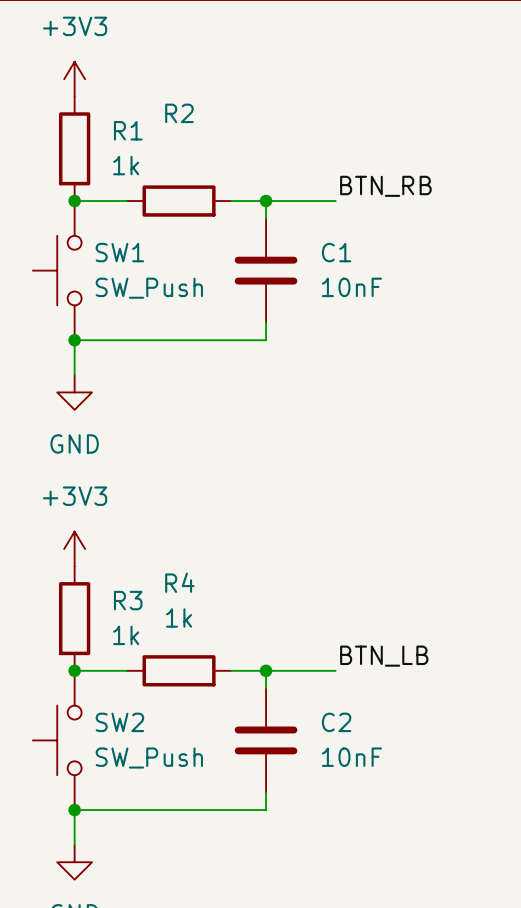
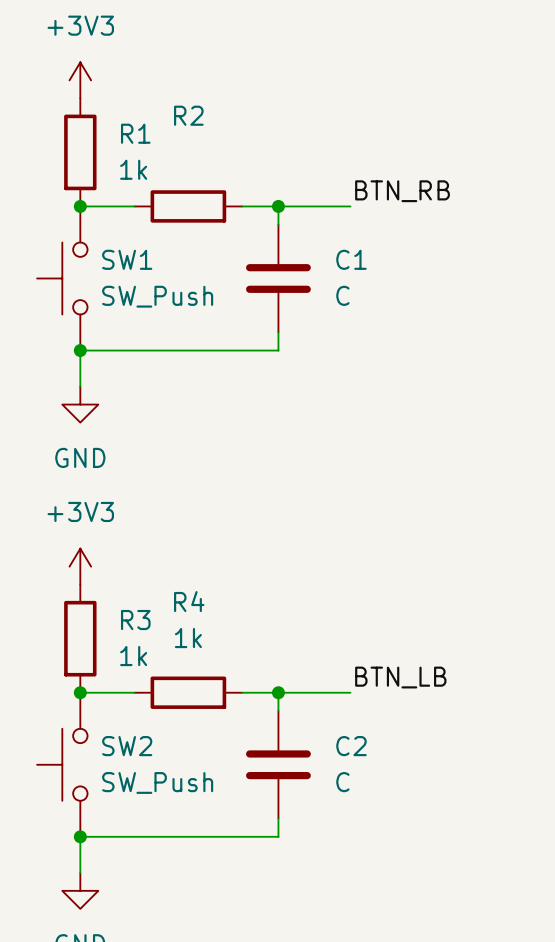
C1 value: 10nF (351, 287) -> C (342, 295)
C2 value: 10nF (351, 757) -> C (342, 782)

